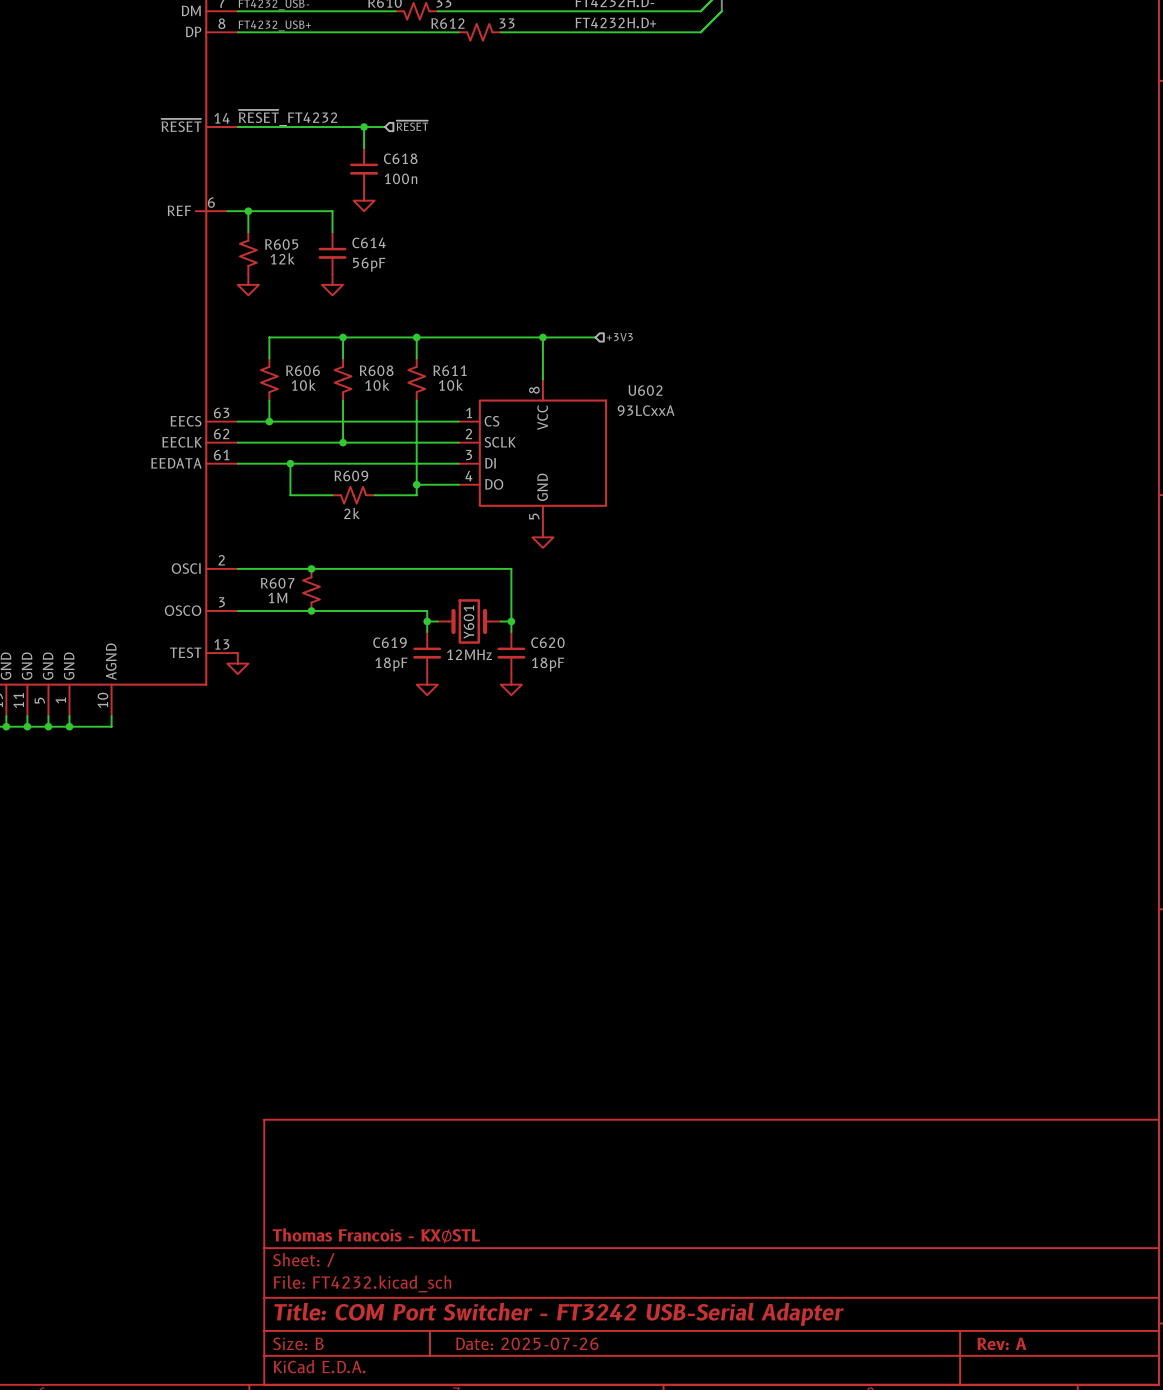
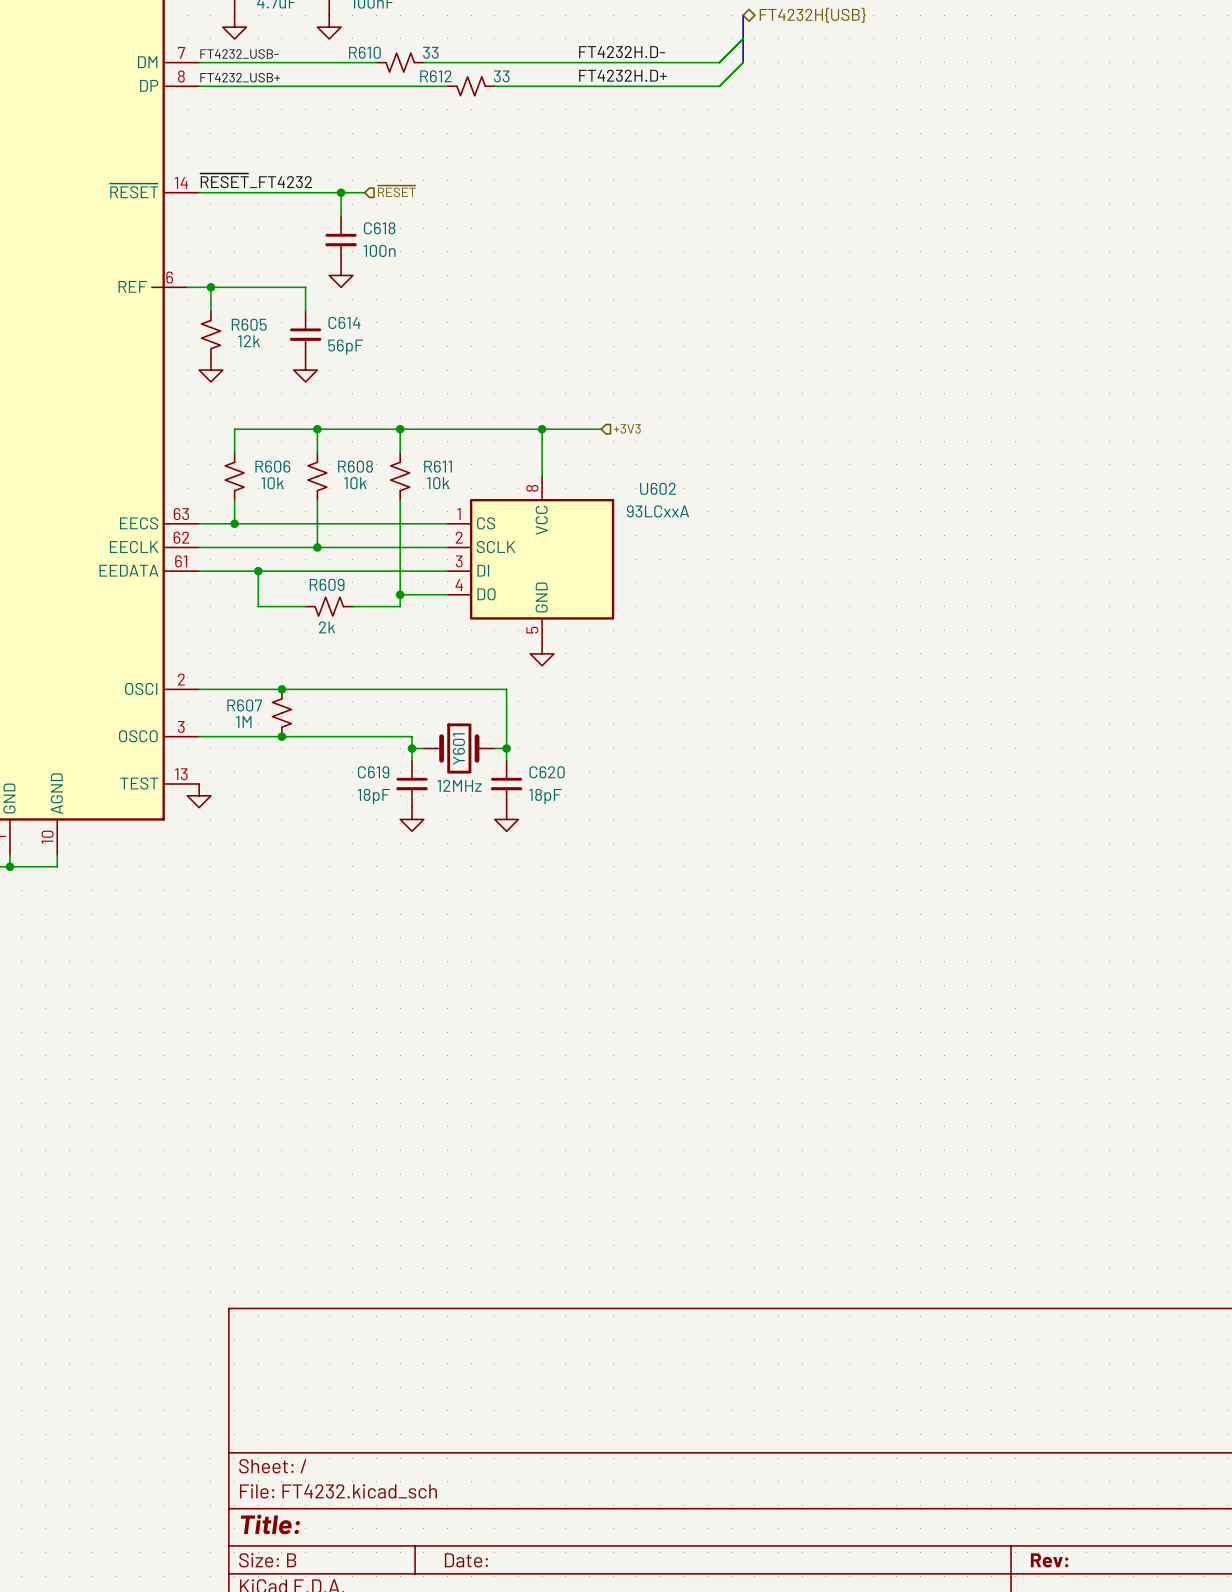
title block: Thomas Francois - KX∅STL (376, 1235) -> none
title block: Title: COM Port Switcher - FT3242 USB-Serial Adapter (559, 1314) -> Title: (270, 1524)
title block: Date: 2025-07-26 (527, 1343) -> Date: (466, 1560)
title block: Rev: A (1001, 1343) -> Rev: (1049, 1560)

